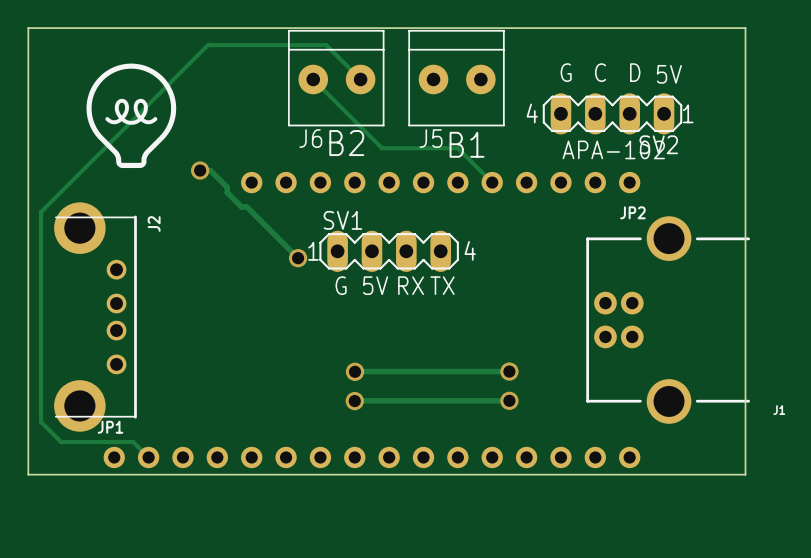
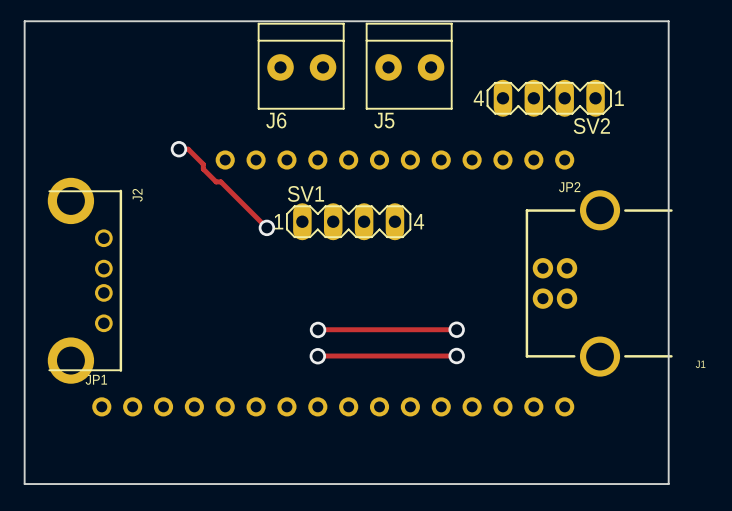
drawing: [86, 63, 177, 169] -> none
text: G (566, 72) -> none
text: C (600, 72) -> none
text: D (635, 72) -> none
text: 5V (669, 74) -> none
track: (313, 79) (381, 148) (457, 148) (492, 182) -> none
track: (360, 79) (326, 45) (208, 45) (41, 212) (41, 422) (61, 442) (133, 442) (147, 457) -> none
text: B2 (346, 143) -> none
text: B1 (467, 144) -> none
text: APA-102 (613, 149) -> none
text: G (341, 285) -> none
text: 5V (375, 285) -> none
text: RX (411, 285) -> none
text: TX (442, 285) -> none
board edge: (28, 474) (745, 474) -> (24, 422) (24, 484) (668, 484) (668, 422)

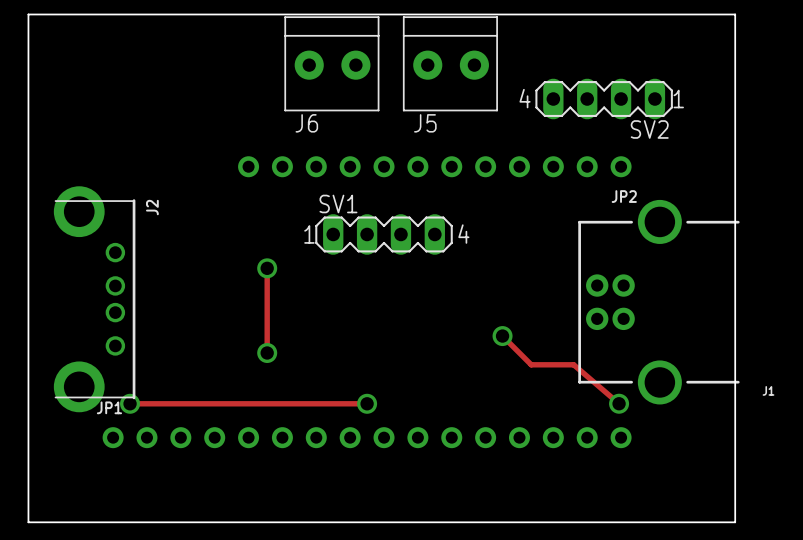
track: (178, 149) (188, 149) (203, 164) (203, 169) (216, 181) (220, 181) (266, 227) -> none
via: (178, 149) -> none
via: (266, 227) -> none
track: none -> (267, 268) (267, 352)
via: none -> (267, 268)
track: none -> (502, 336) (531, 364) (573, 364) (619, 403)
via: none -> (502, 336)
via: none -> (267, 352)
via: (318, 329) -> none
track: (456, 329) (318, 329) -> none
via: (456, 329) -> none
via: (317, 356) -> none
track: (456, 356) (317, 356) -> none
via: (456, 356) -> none
via: none -> (619, 403)
track: none -> (130, 403) (367, 403)
via: none -> (130, 403)
via: none -> (367, 403)

